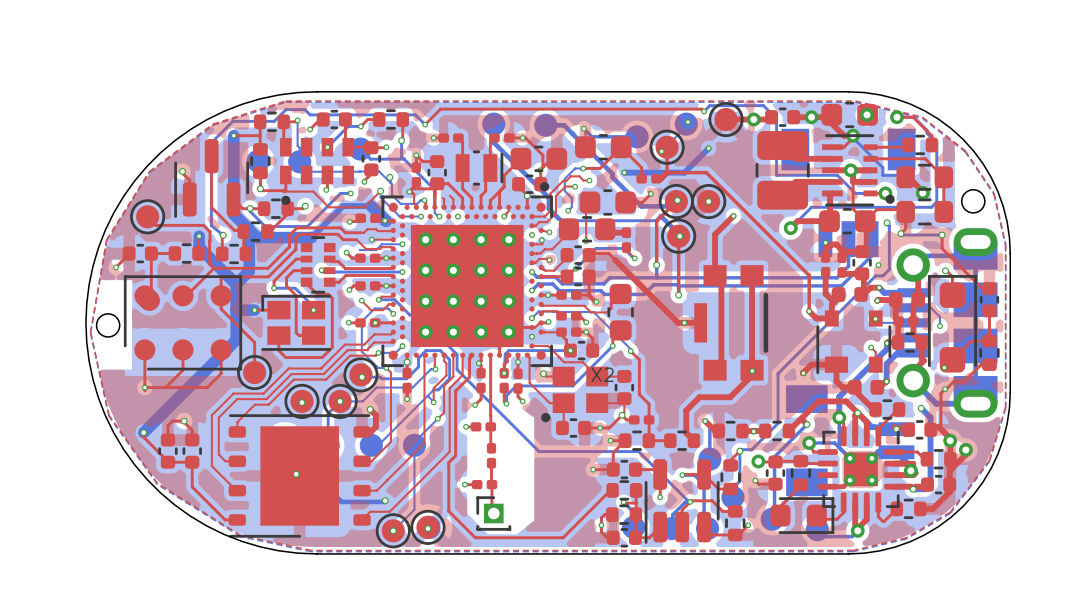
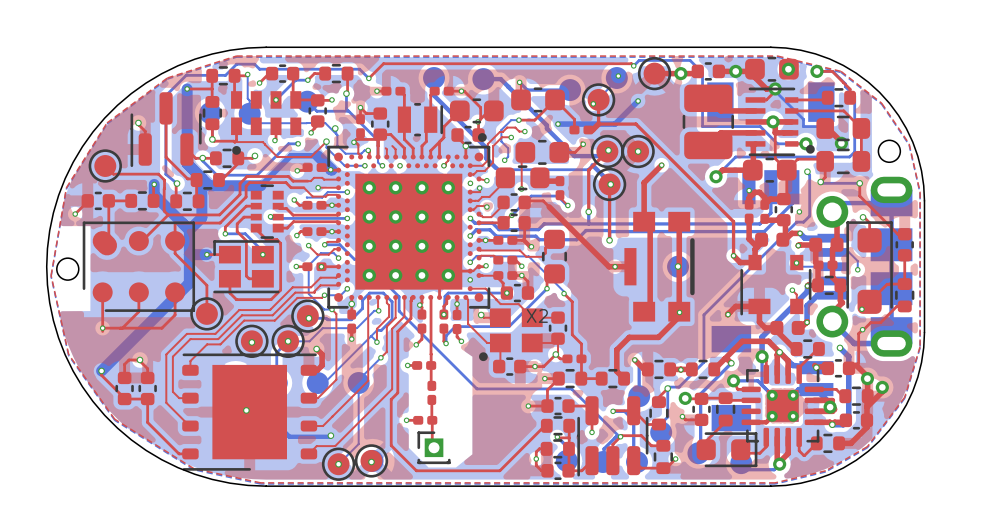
part: none -> (678, 266)
via: none -> (678, 266)

